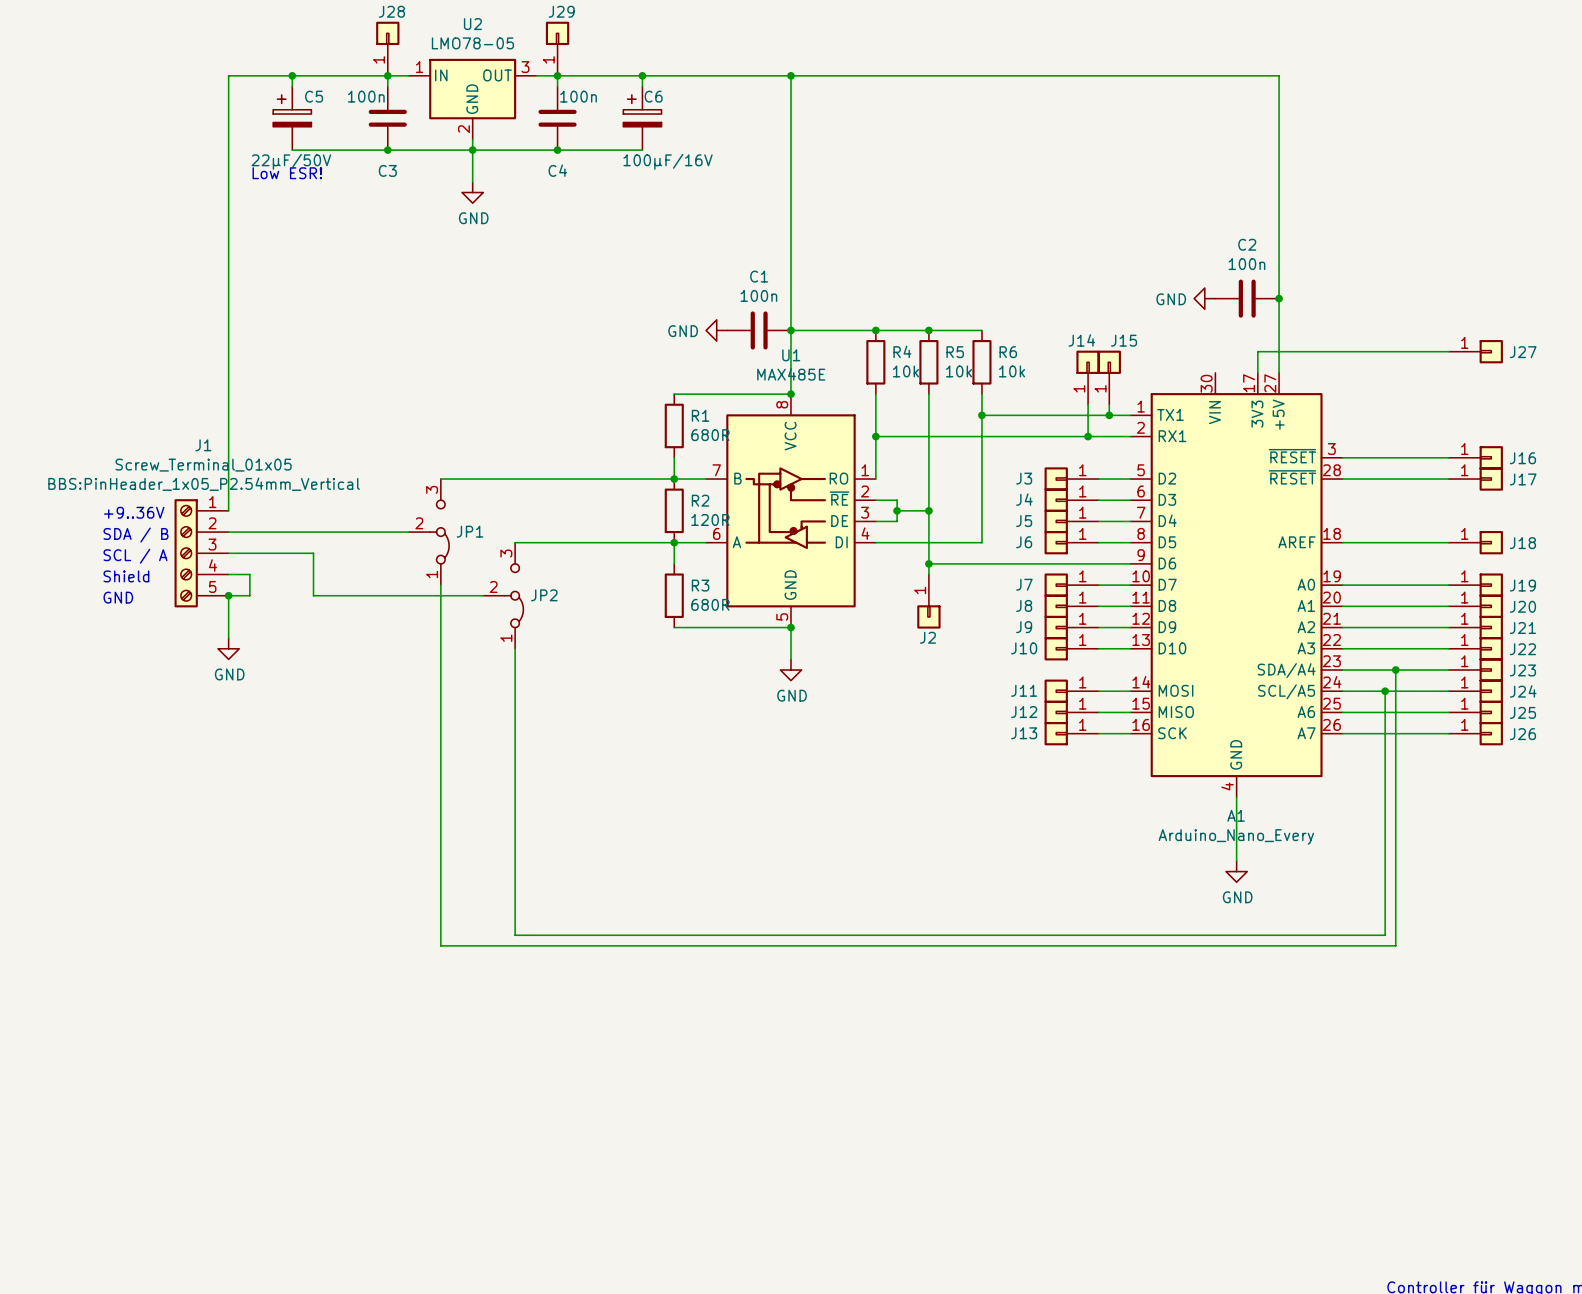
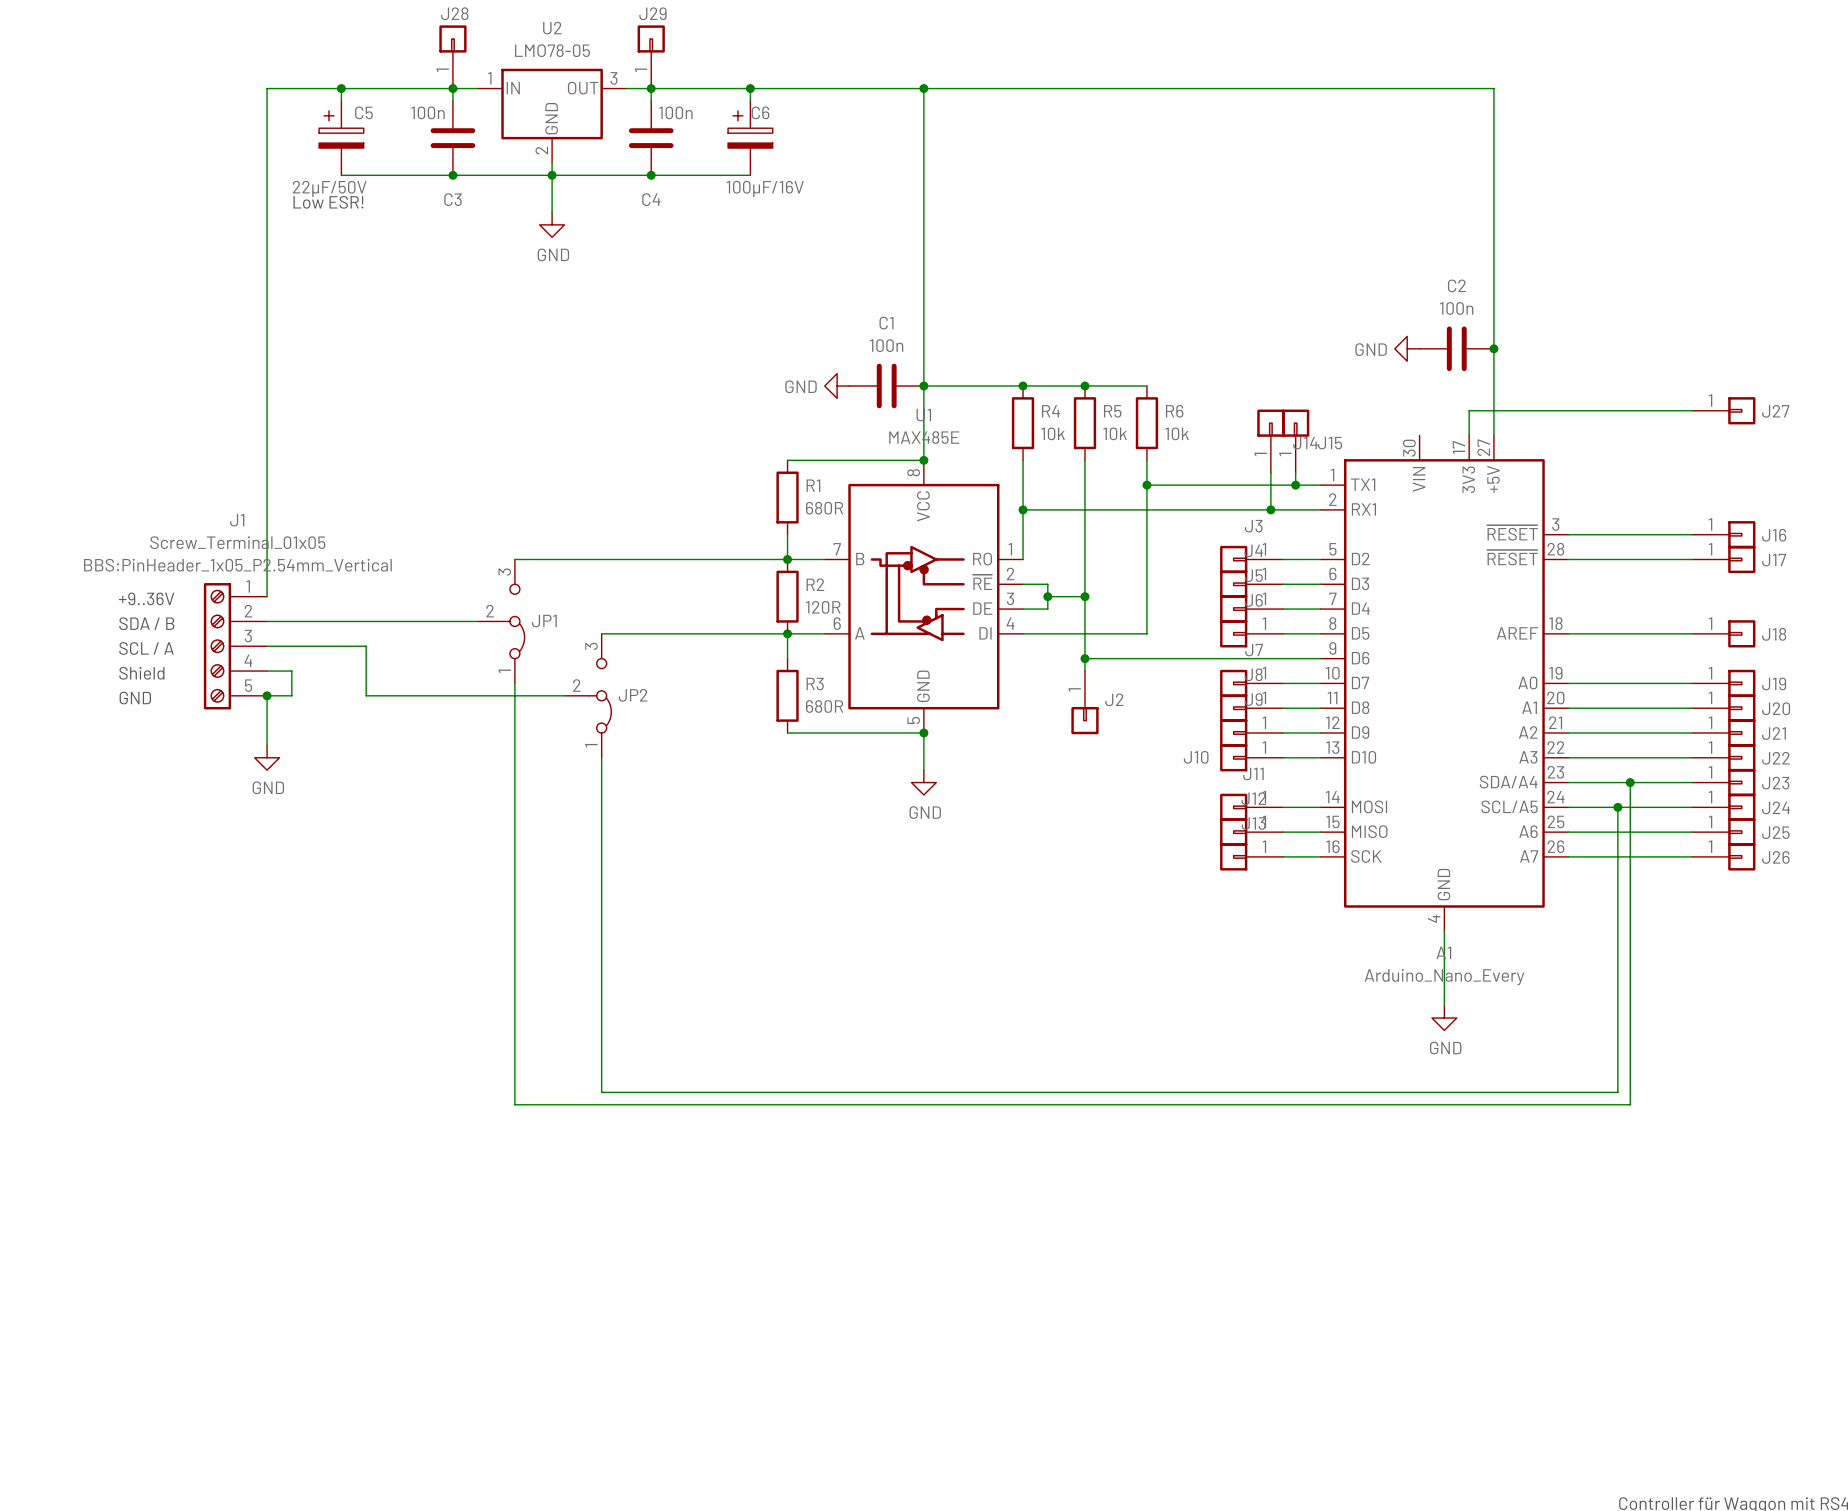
J14 name position: J14 (1081, 340) -> J14 (1305, 443)
J15 name position: J15 (1124, 340) -> J15 (1330, 443)
J3 name position: J3 (1024, 478) -> J3 (1253, 526)
J4 name position: J4 (1024, 499) -> J4 (1253, 550)
J5 name position: J5 (1024, 521) -> J5 (1253, 575)
J6 name position: J6 (1024, 542) -> J6 (1253, 600)
J7 name position: J7 (1024, 584) -> J7 (1254, 650)
J8 name position: J8 (1024, 605) -> J8 (1253, 674)
J9 name position: J9 (1024, 627) -> J9 (1253, 699)
J2 name position: J2 (927, 637) -> J2 (1114, 699)
J11 name position: J11 (1024, 690) -> J11 (1253, 773)
J12 name position: J12 (1024, 712) -> J12 (1253, 798)
J13 name position: J13 (1024, 733) -> J13 (1253, 823)

